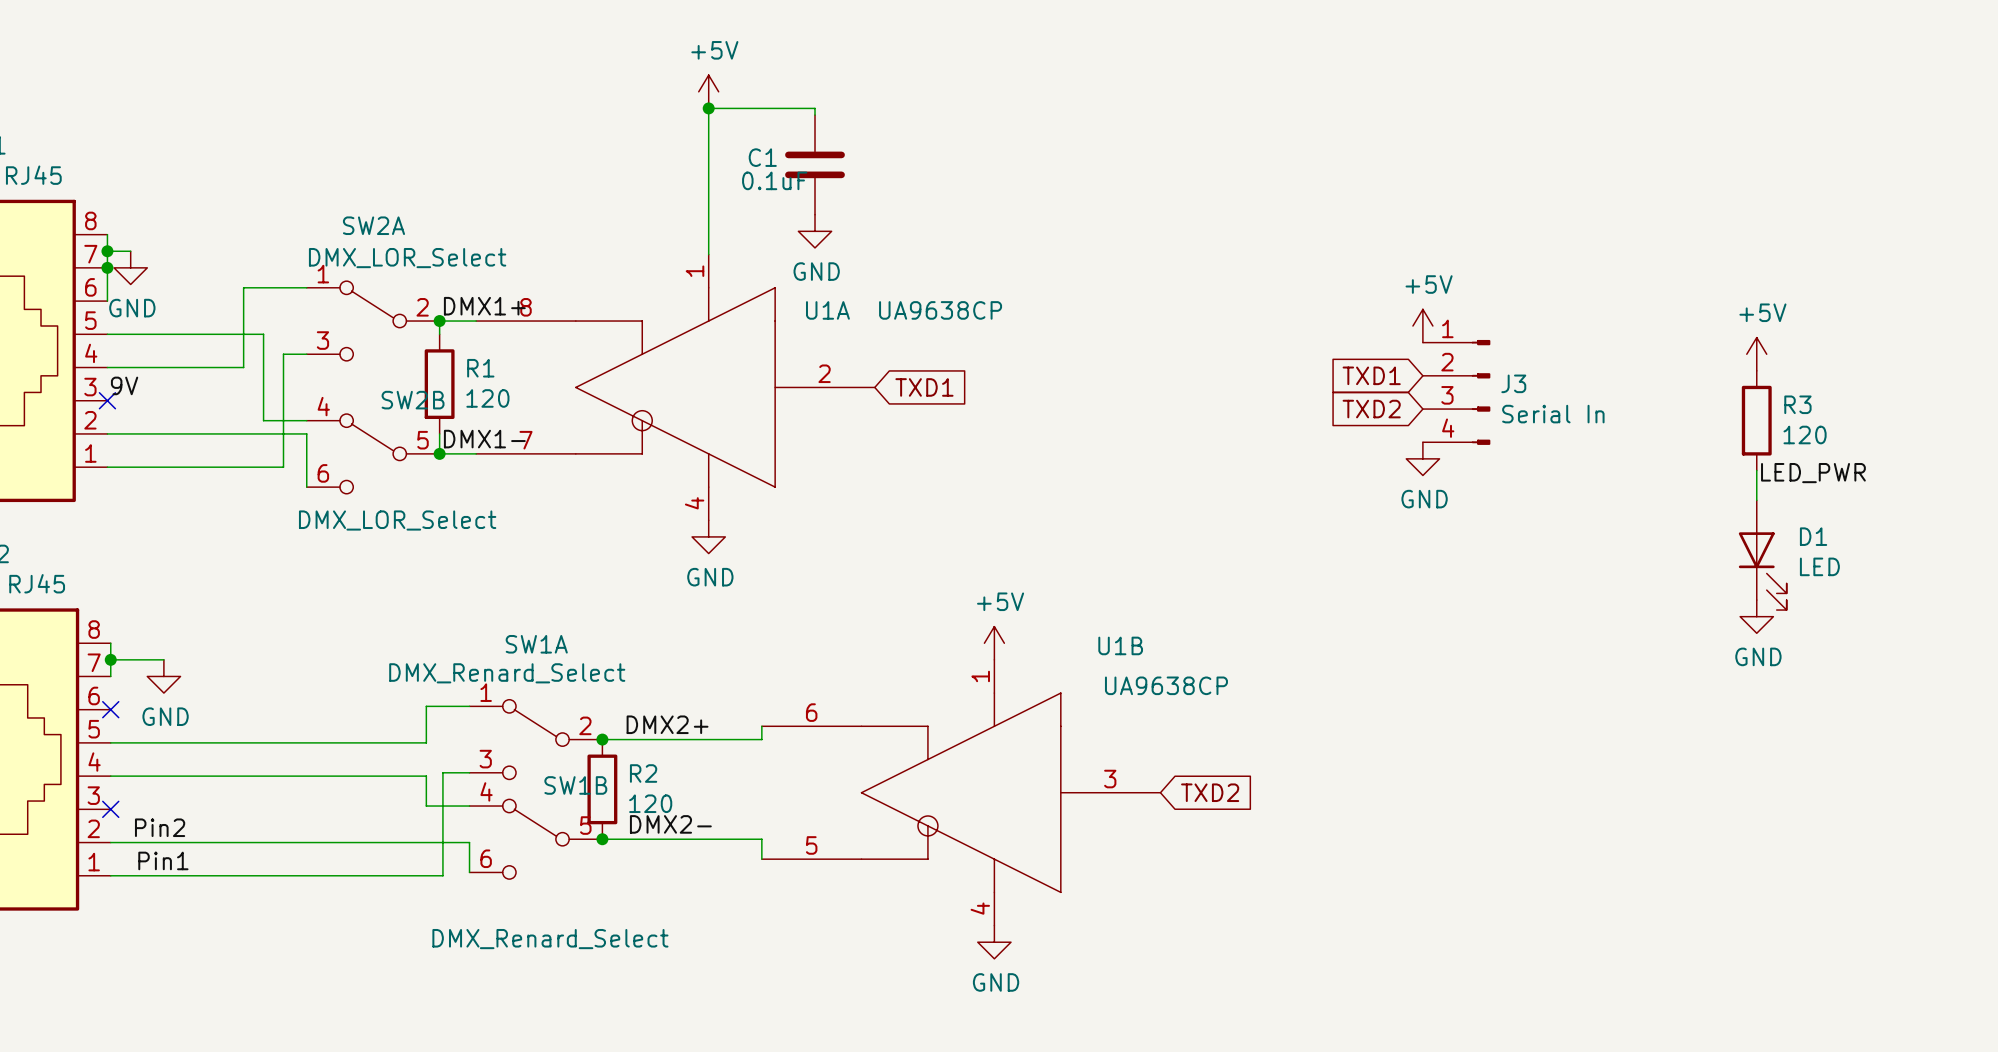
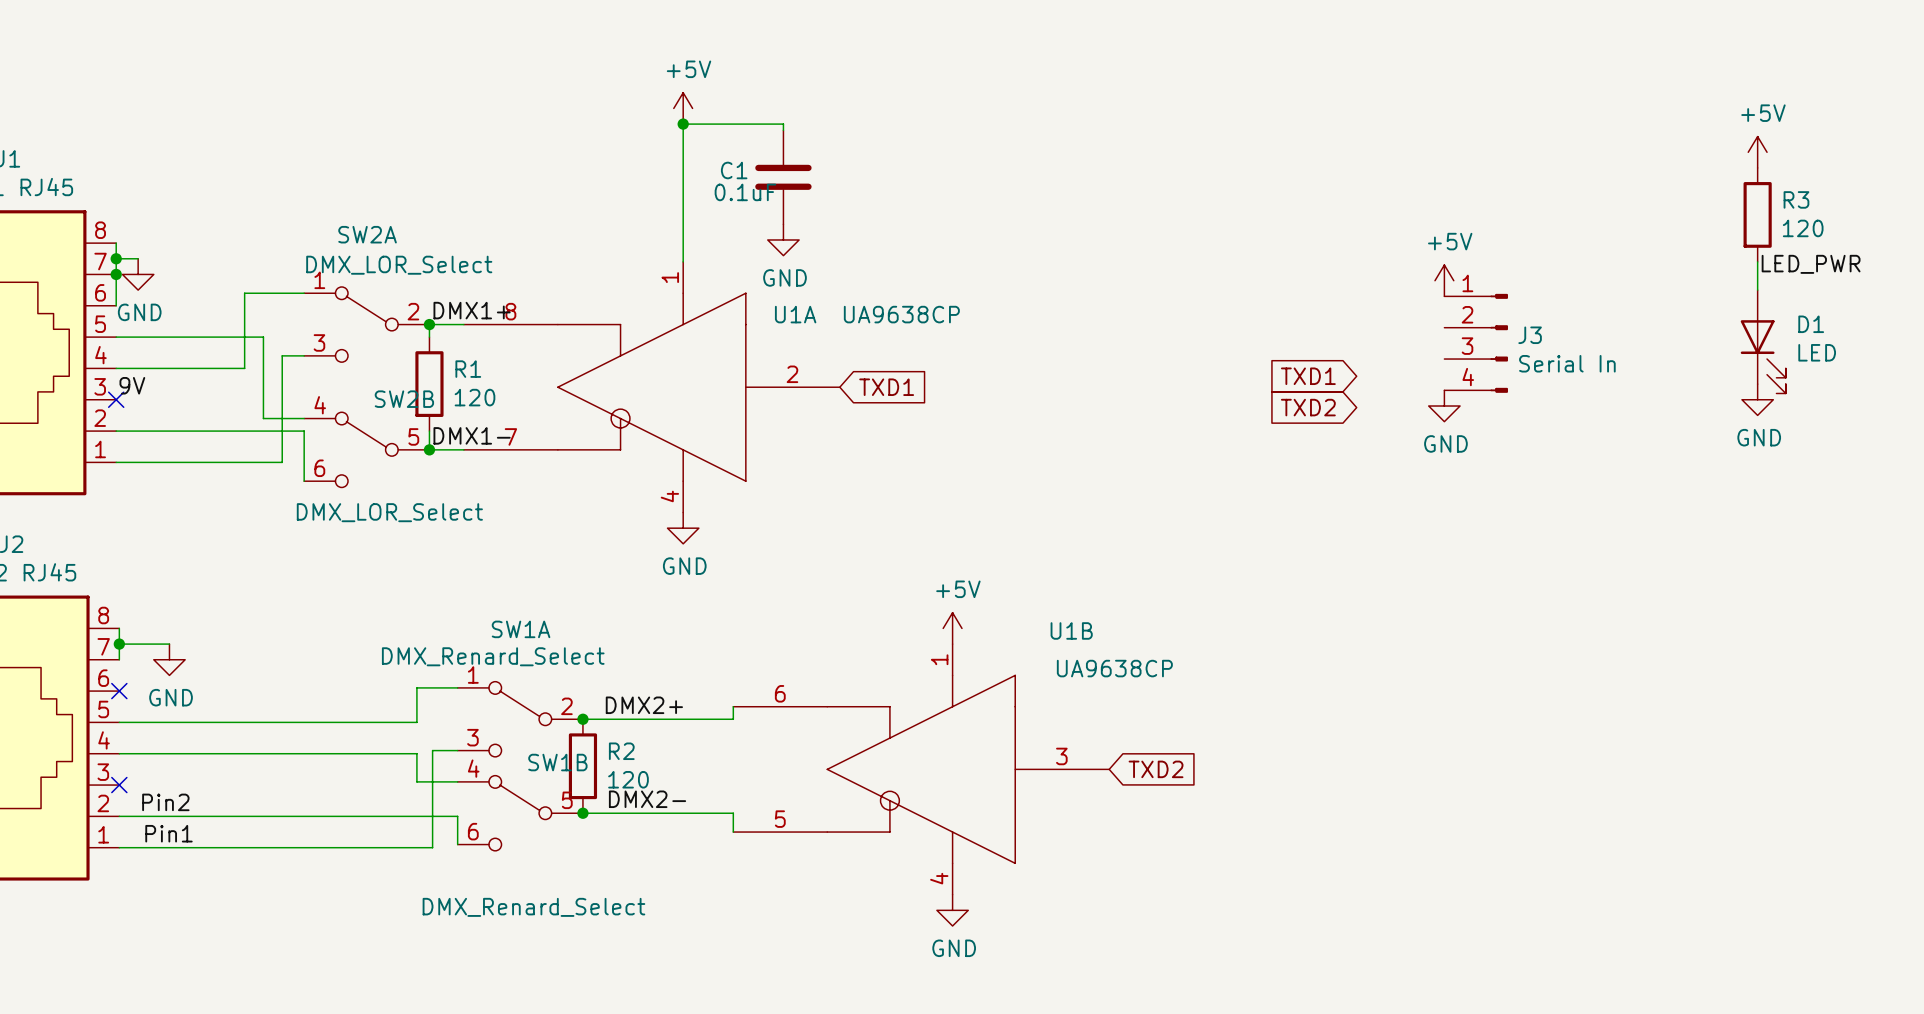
power symbol: none -> +5V (1757, 152)
power symbol position: +5V (1422, 326) -> +5V (1444, 280)
power symbol: +5V (1756, 354) -> none
J3 position: (1456, 392) -> (1476, 343)
power symbol: none -> GND (1757, 399)
R3 position: (1756, 420) -> (1757, 214)
power symbol position: GND (1422, 458) -> GND (1444, 406)
wire: (1756, 470) (1756, 500) -> (1757, 261) (1757, 290)
label position: LED_PWR (1813, 473) -> LED_PWR (1811, 264)
D1 position: (1762, 555) -> (1763, 341)
power symbol: GND (1756, 616) -> none

